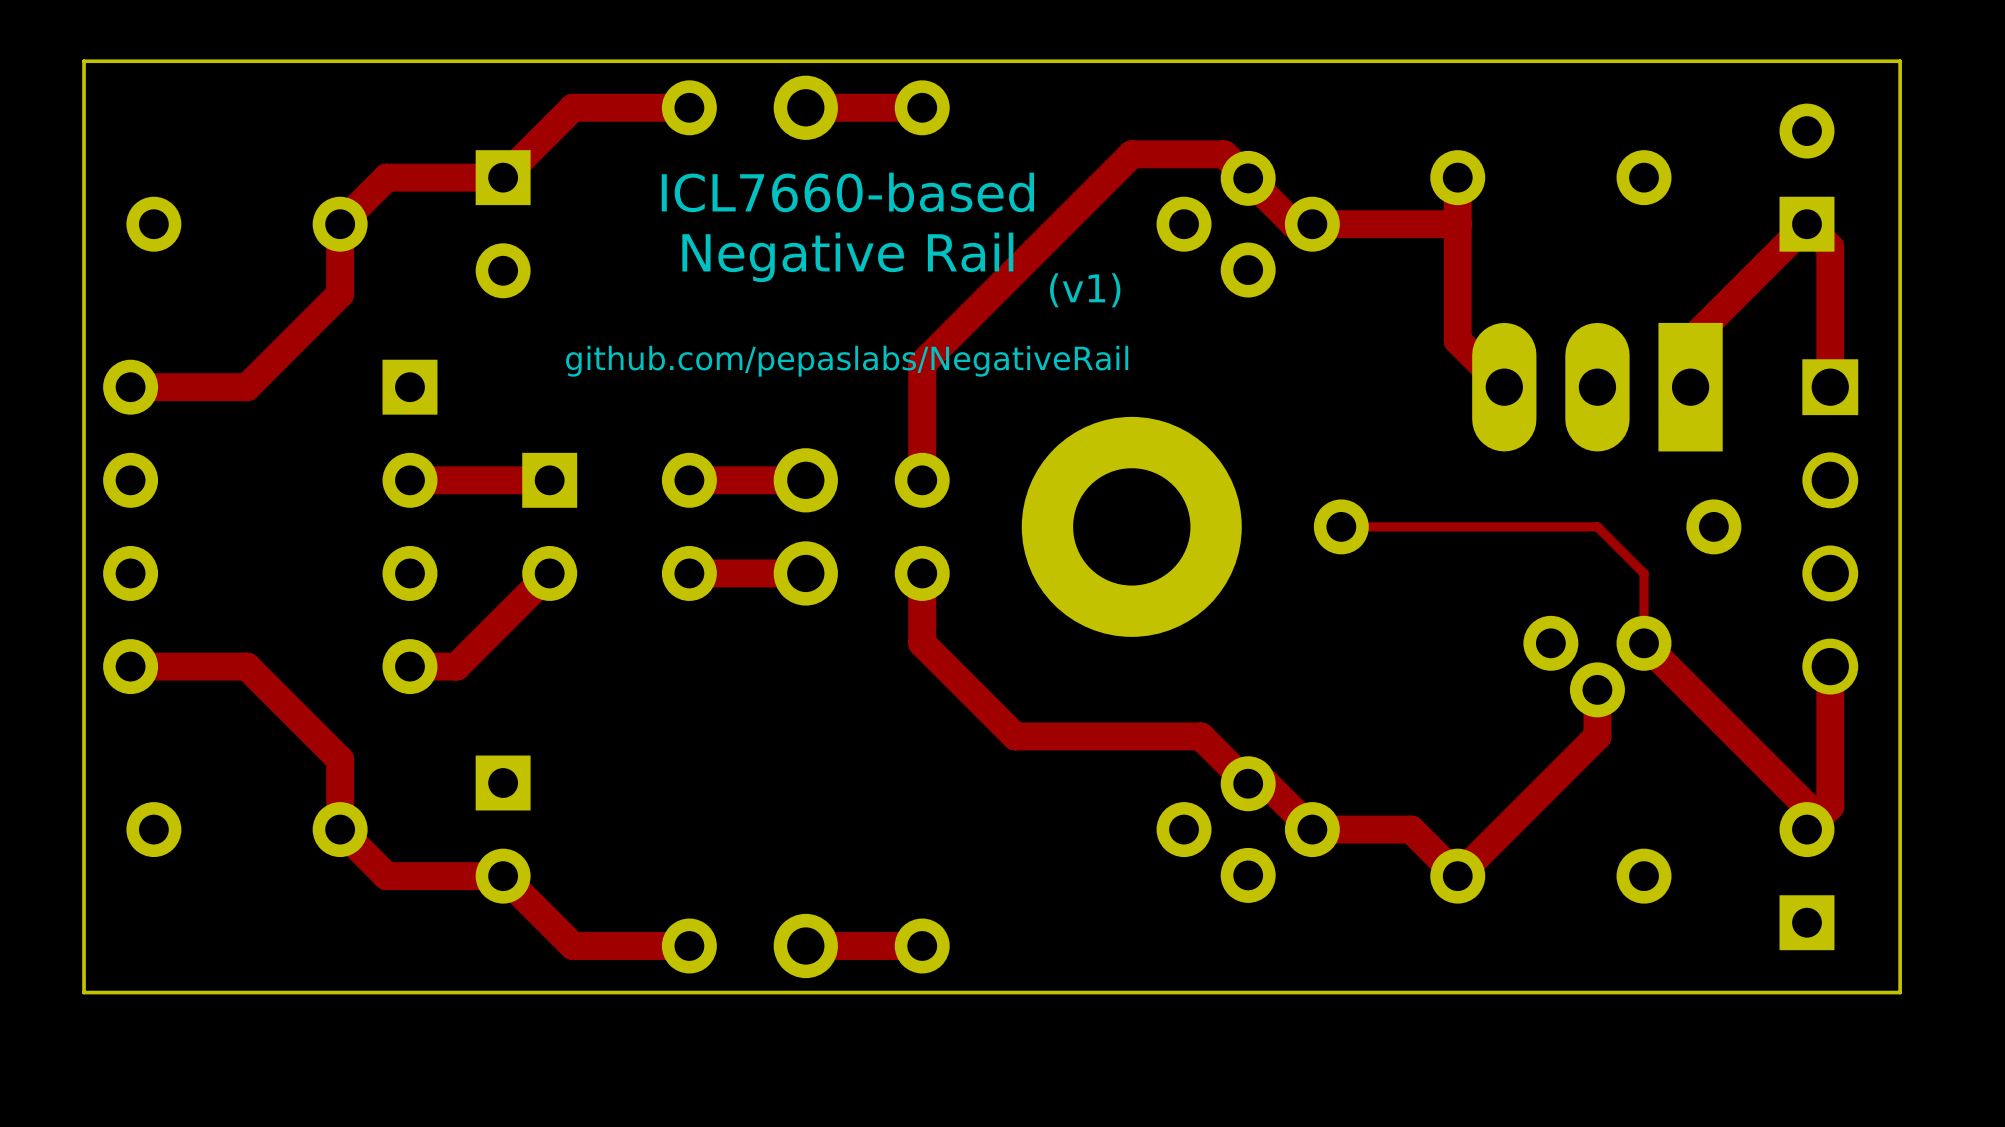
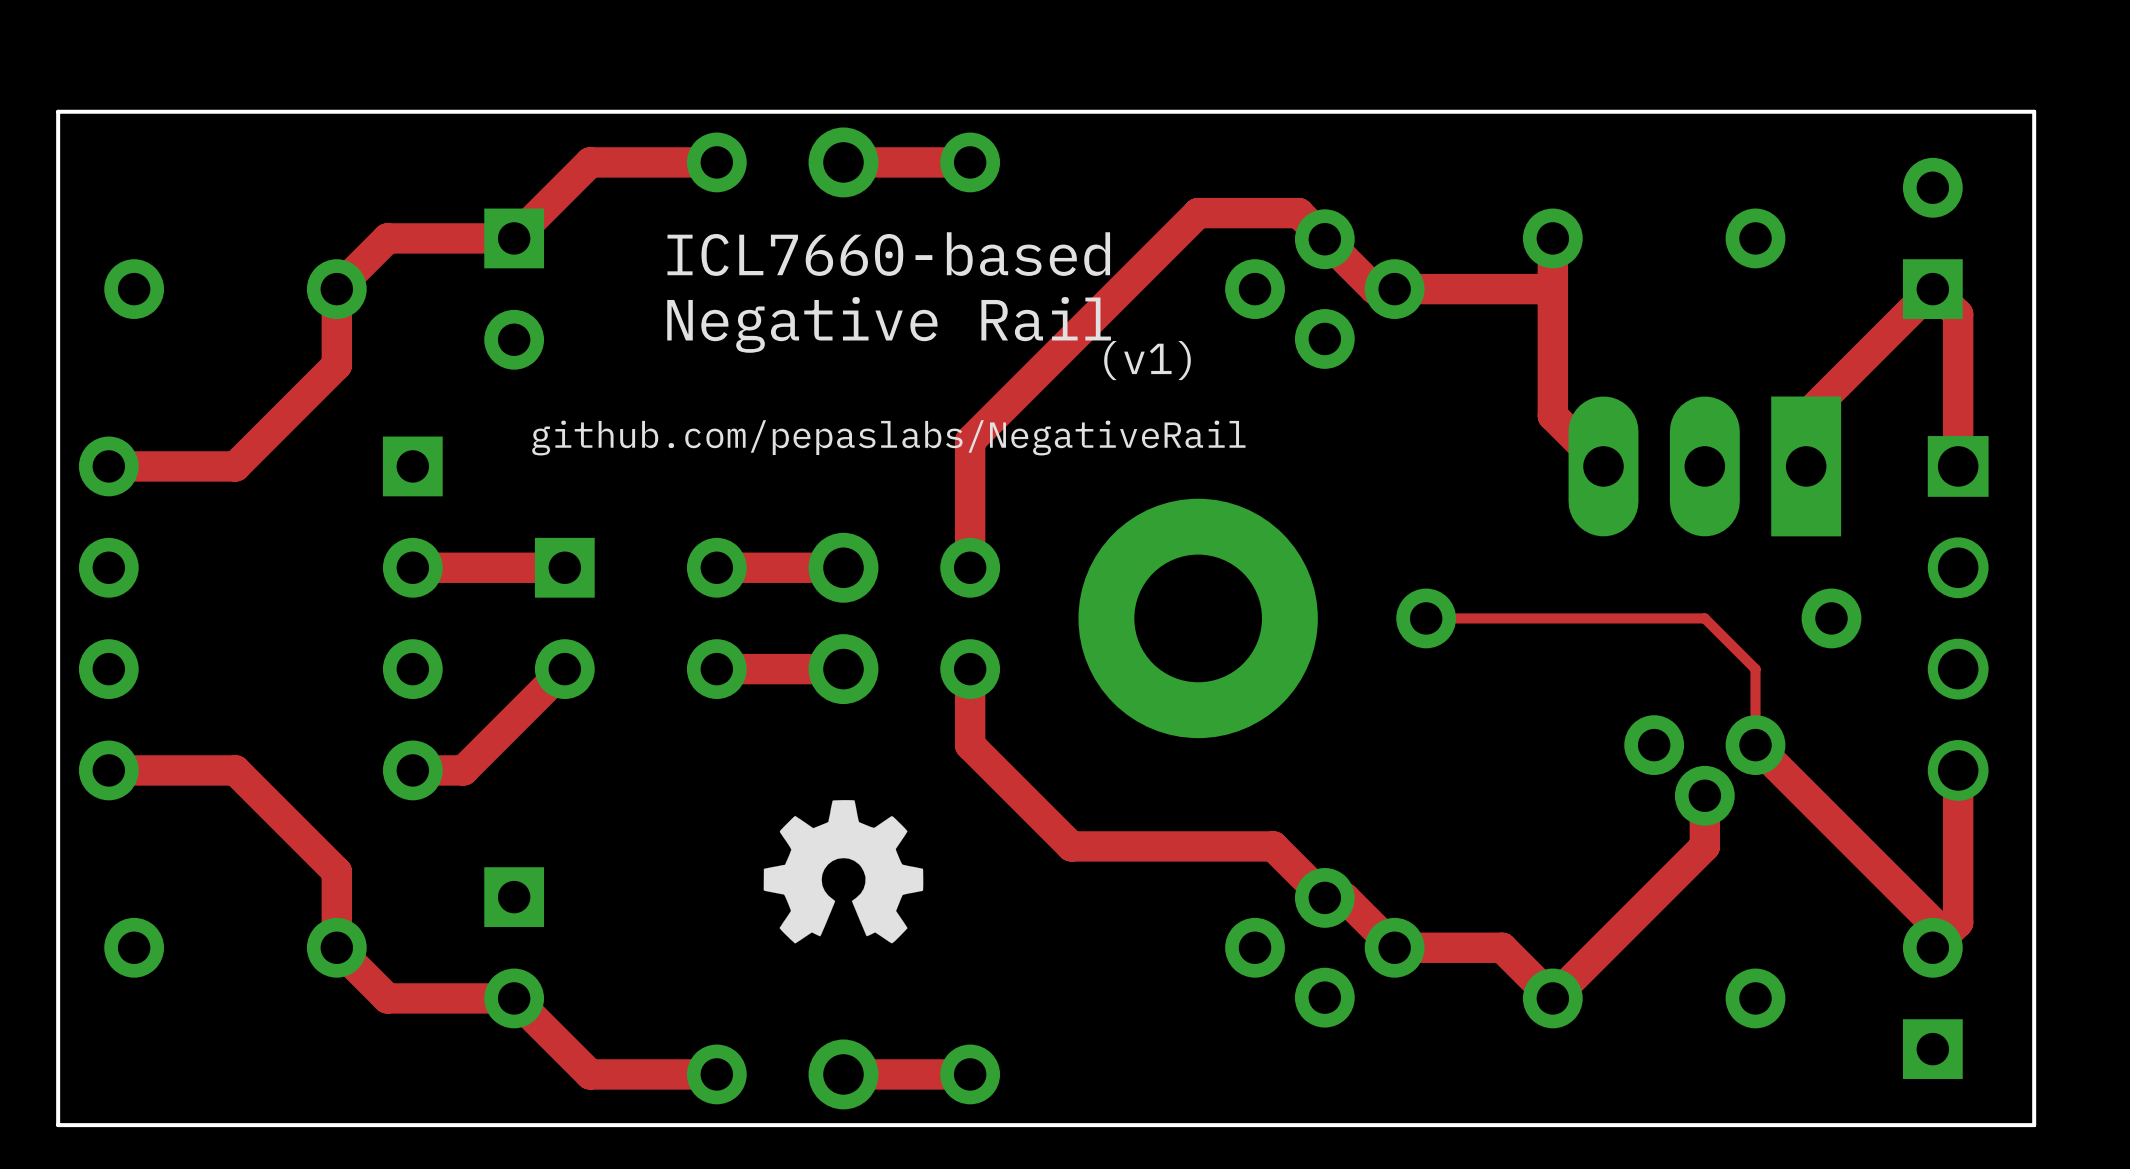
drawing: none -> [763, 800, 924, 944]

